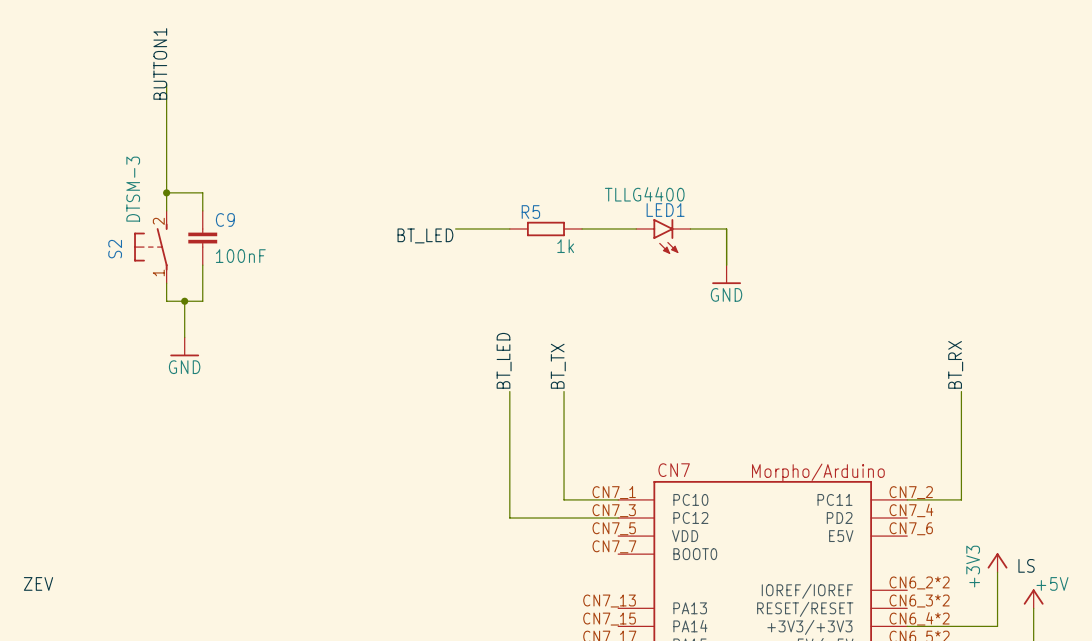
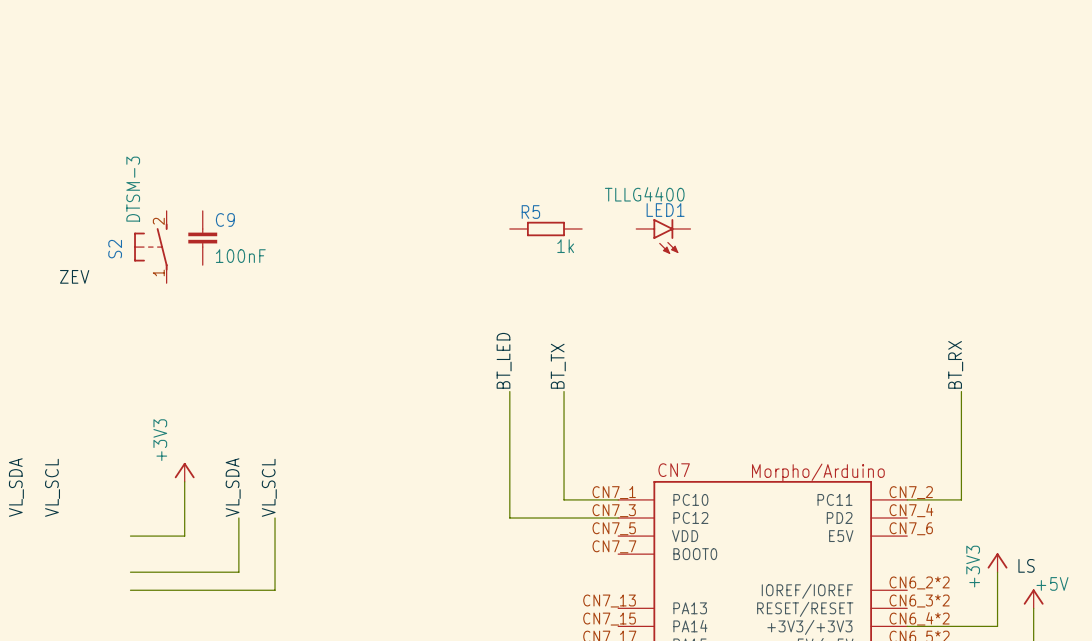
label: BUTTON1 (160, 63) -> none
wire: (166, 84) (166, 210) -> none
wire: (166, 192) (202, 192) (202, 210) -> none
junction: (166, 192) -> none
wire: (455, 228) (509, 228) -> none
wire: (582, 228) (636, 228) -> none
wire: (690, 228) (726, 228) (726, 265) -> none
label: BT_LED (425, 235) -> none
wire: (202, 265) (202, 301) (166, 301) (166, 283) -> none
power symbol: GND (726, 274) -> none
label: none -> ZEV (74, 276)
wire: (184, 301) (184, 337) -> none
junction: (184, 301) -> none
power symbol: GND (184, 346) -> none
power symbol: none -> +3V3 (184, 472)
wire: none -> (184, 481) (184, 536) (130, 536)
label: none -> VL_SDA (16, 487)
label: none -> VL_SCL (52, 487)
label: none -> VL_SDA (233, 487)
label: none -> VL_SCL (269, 487)
wire: none -> (238, 518) (238, 572) (130, 572)
wire: none -> (275, 518) (275, 590) (130, 590)
label: ZEV (38, 583) -> none

